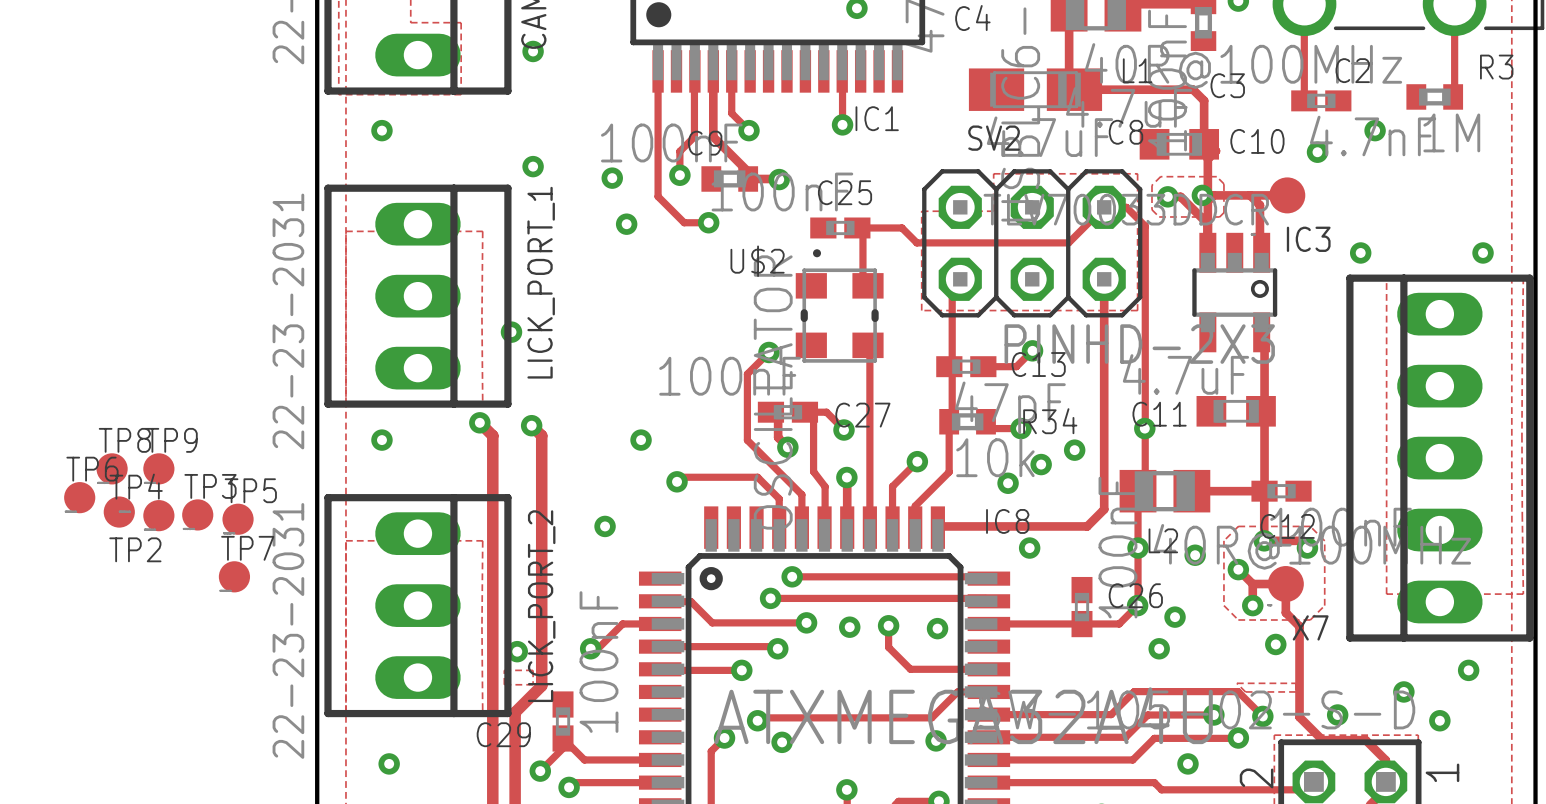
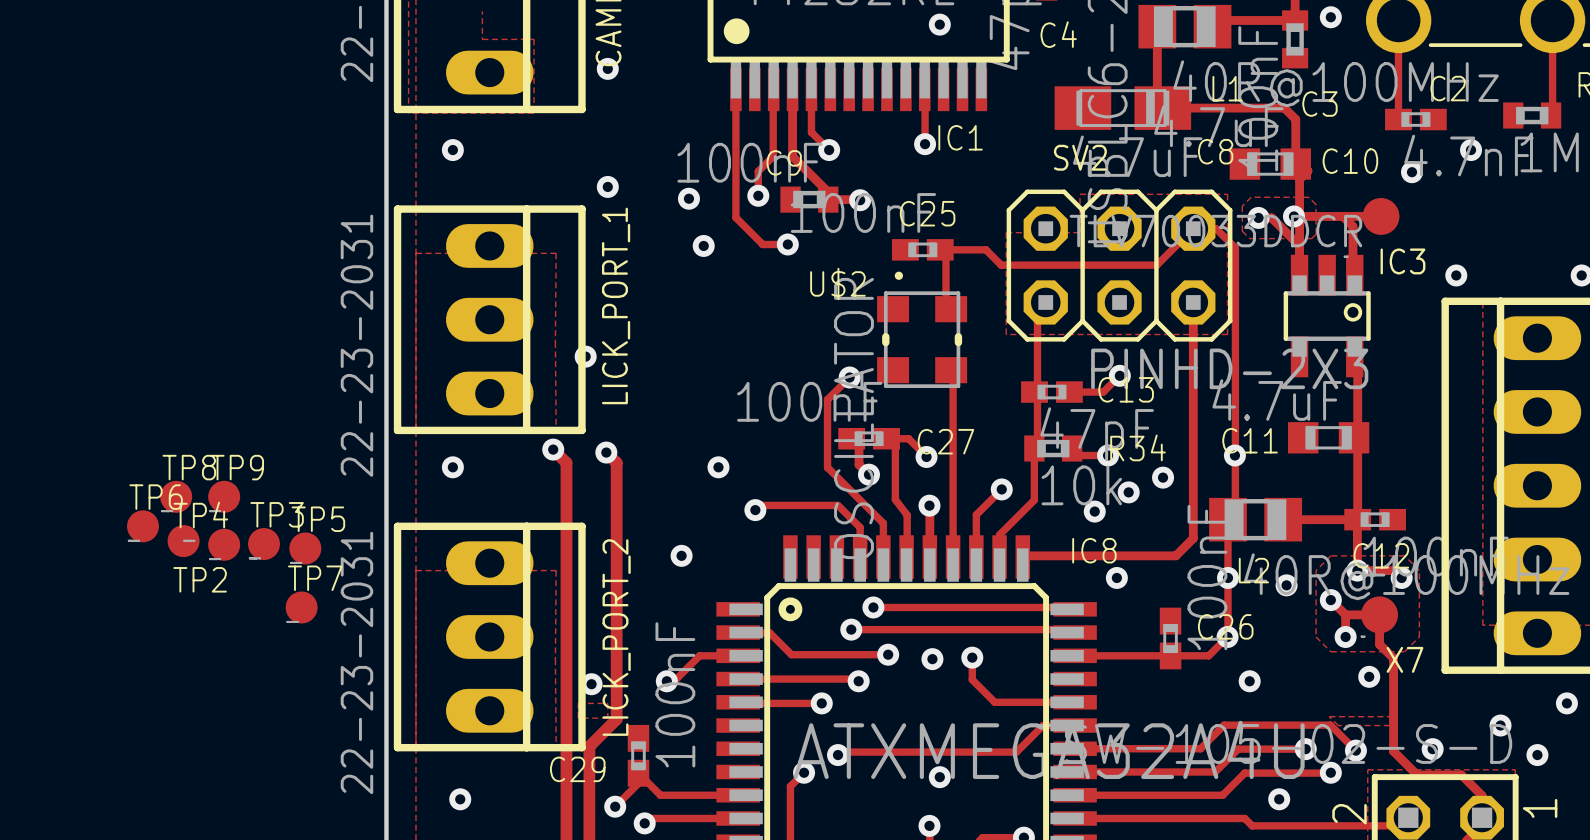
via: (1175, 617) -> none
via: (937, 628) -> none
via: (936, 740) -> none
via: (782, 742) -> none
via: none -> (939, 777)

